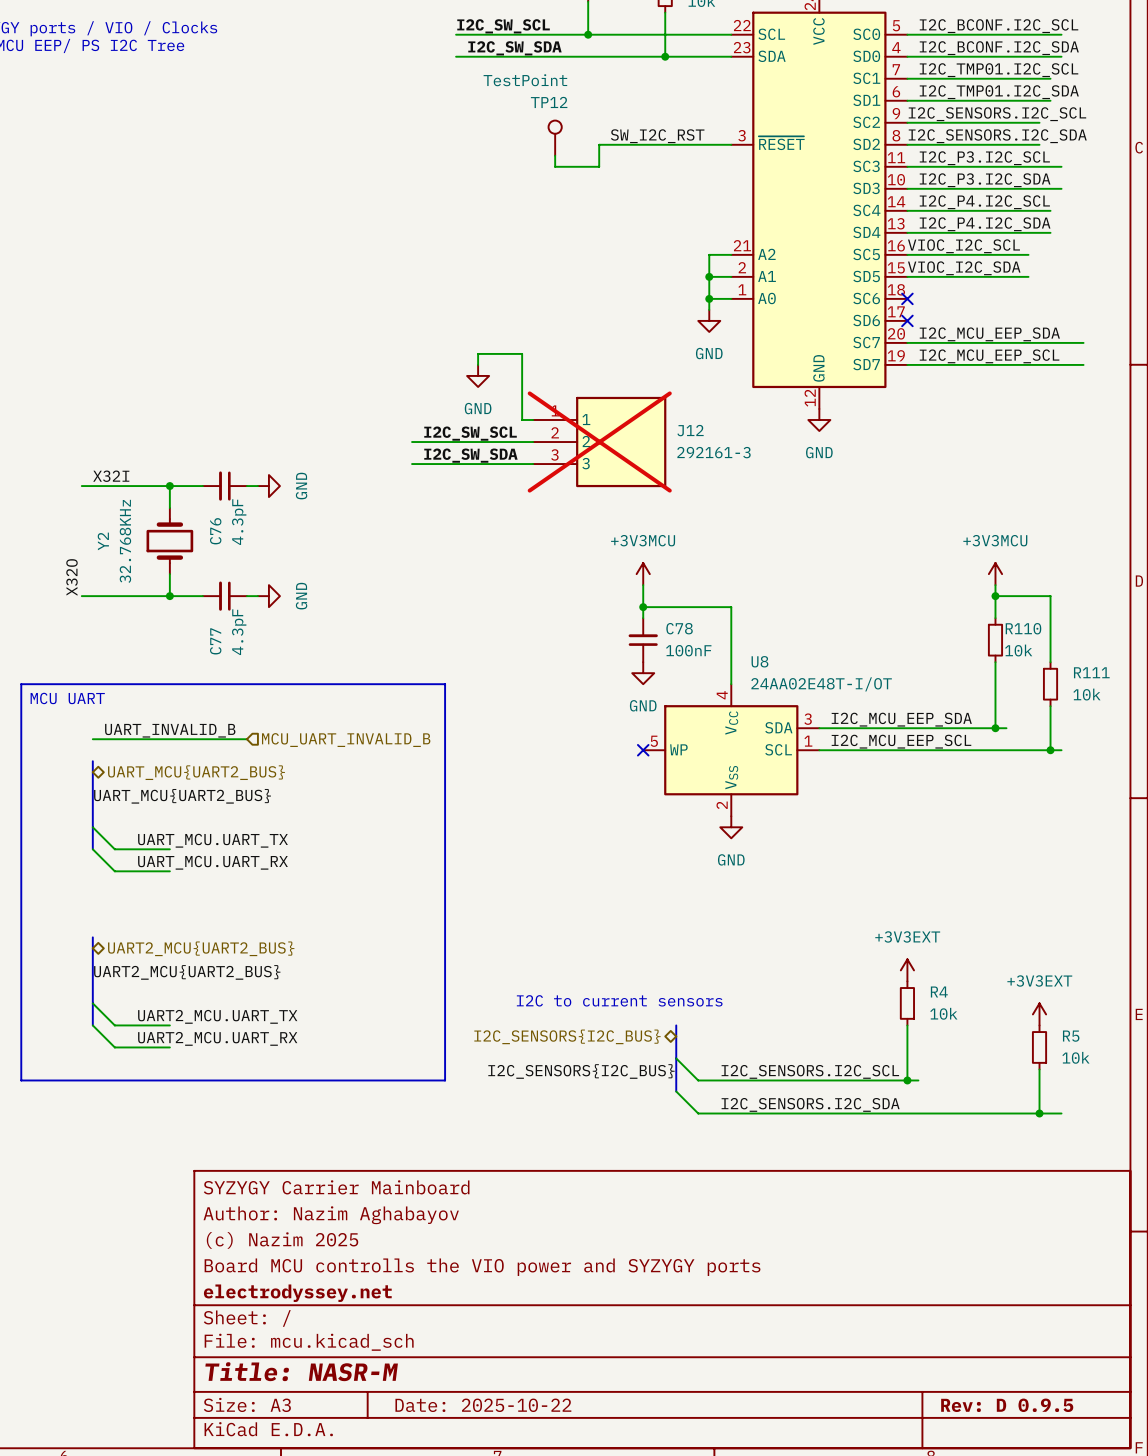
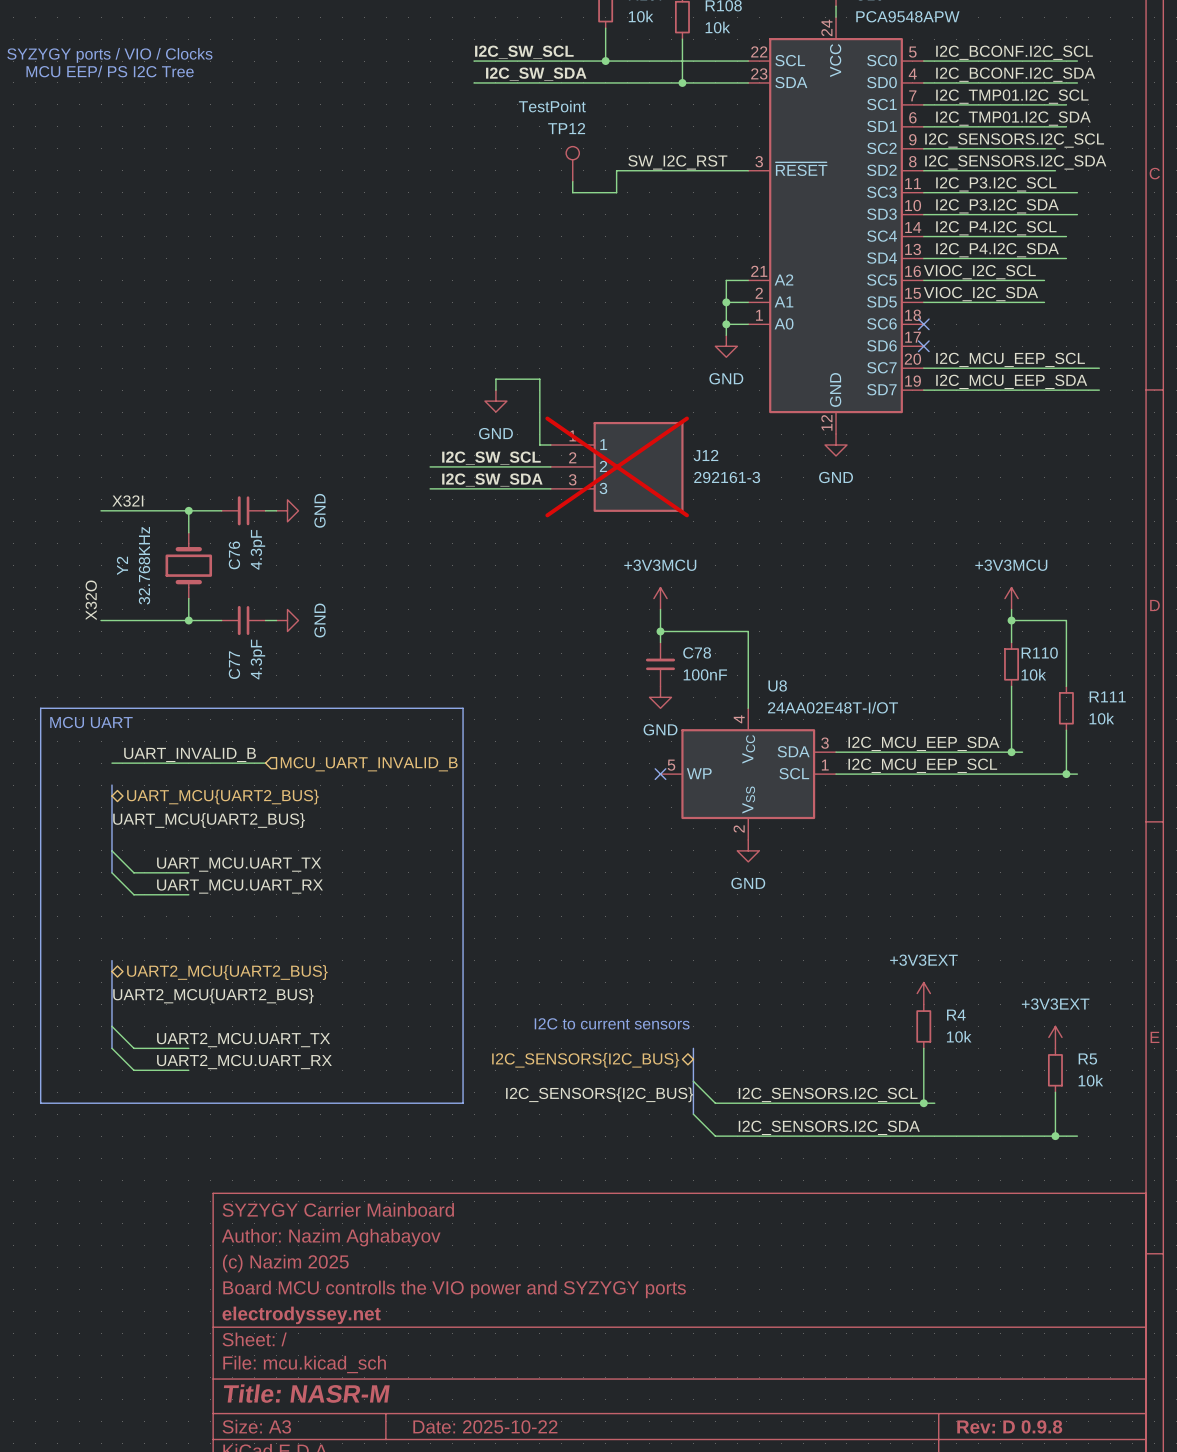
label: I2C_MCU_EEP_SDA (989, 334) -> I2C_MCU_EEP_SCL (1010, 359)
label: I2C_MCU_EEP_SCL (989, 356) -> I2C_MCU_EEP_SDA (1011, 381)
title block: Rev: D 0.9.5 (1007, 1405) -> Rev: D 0.9.8 (1009, 1426)

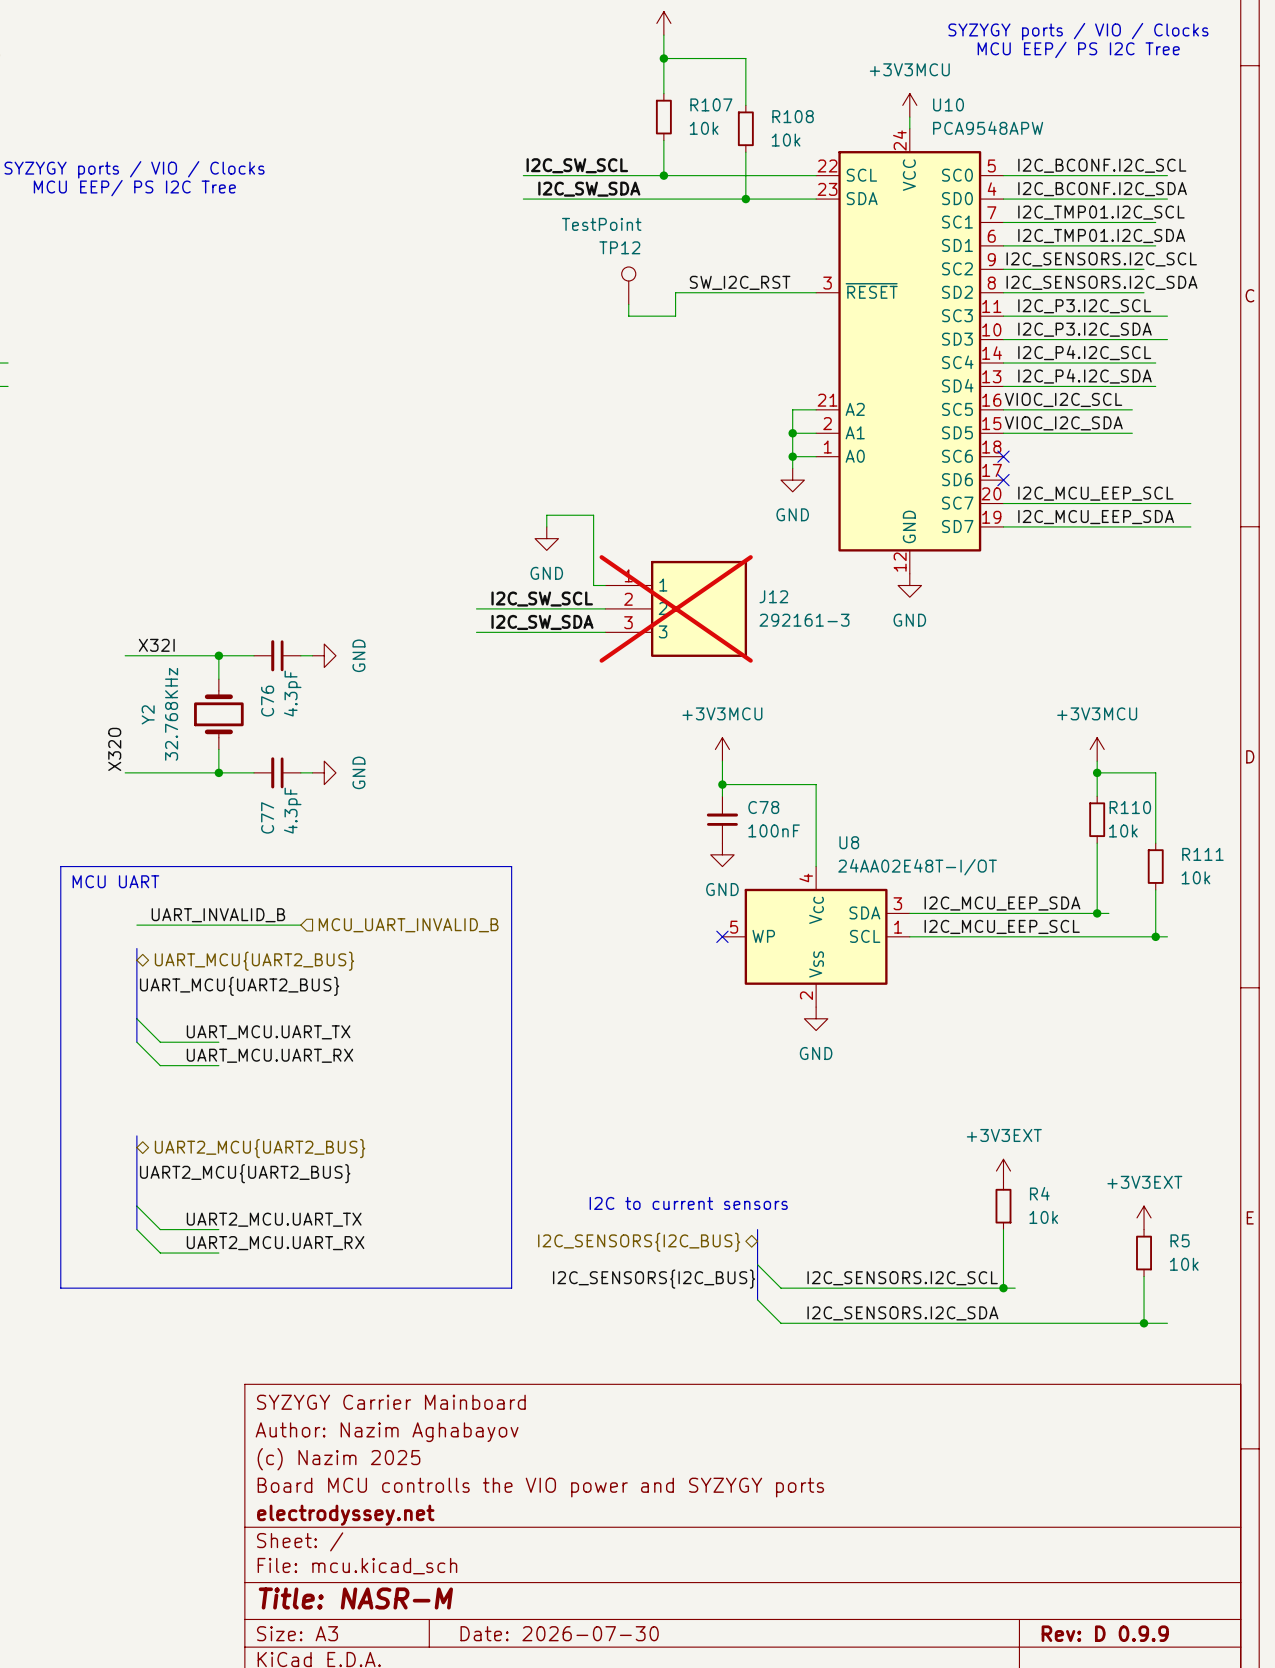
title block: Date: 2025-10-22 (485, 1426) -> Date: 2026-07-30 (559, 1633)
title block: Rev: D 0.9.8 (1009, 1426) -> Rev: D 0.9.9 (1105, 1633)

